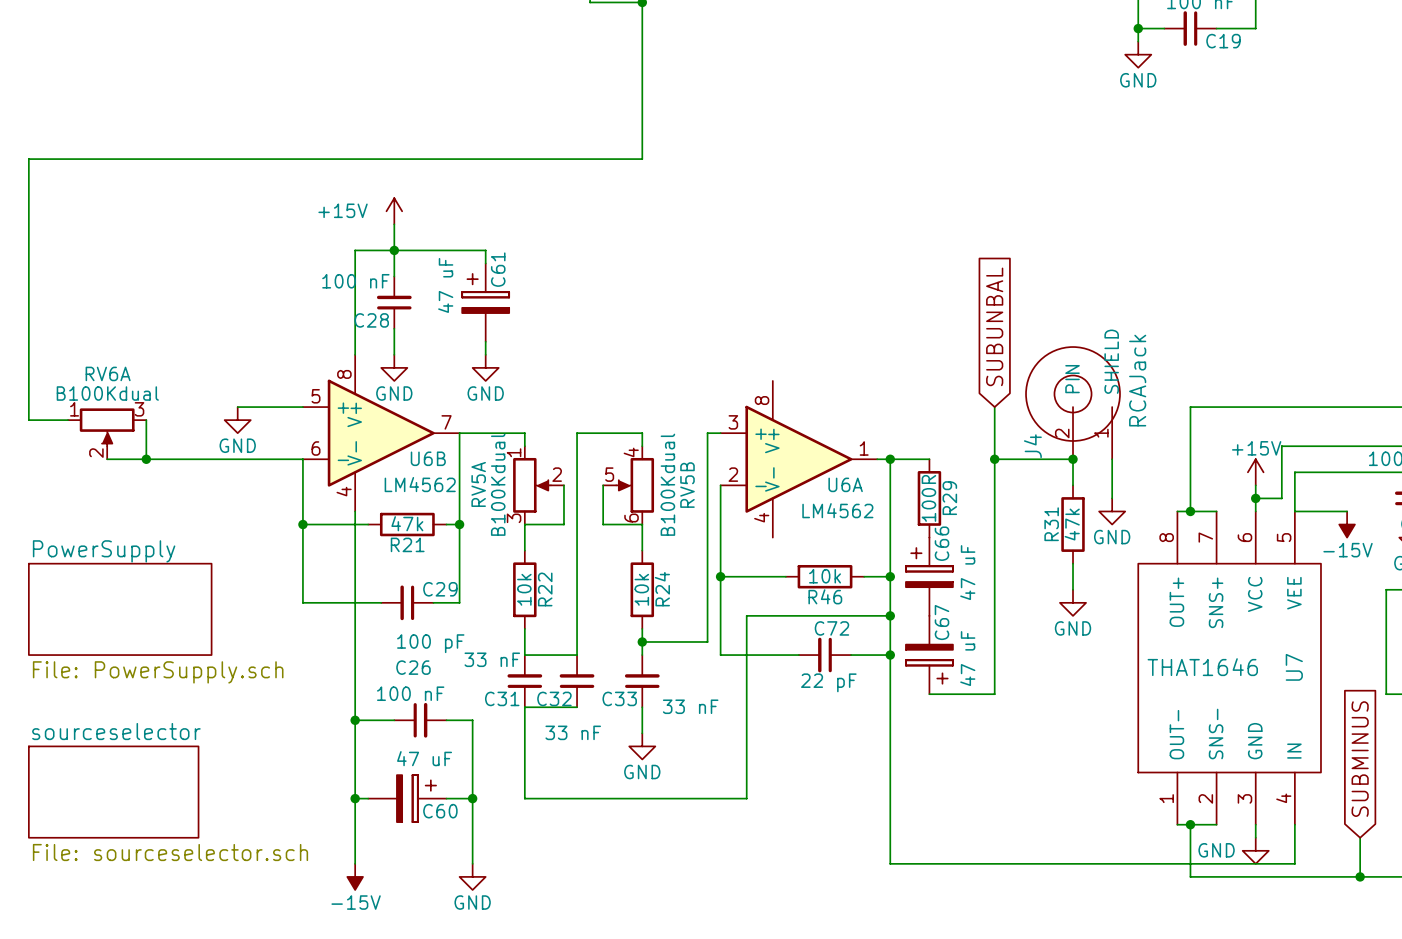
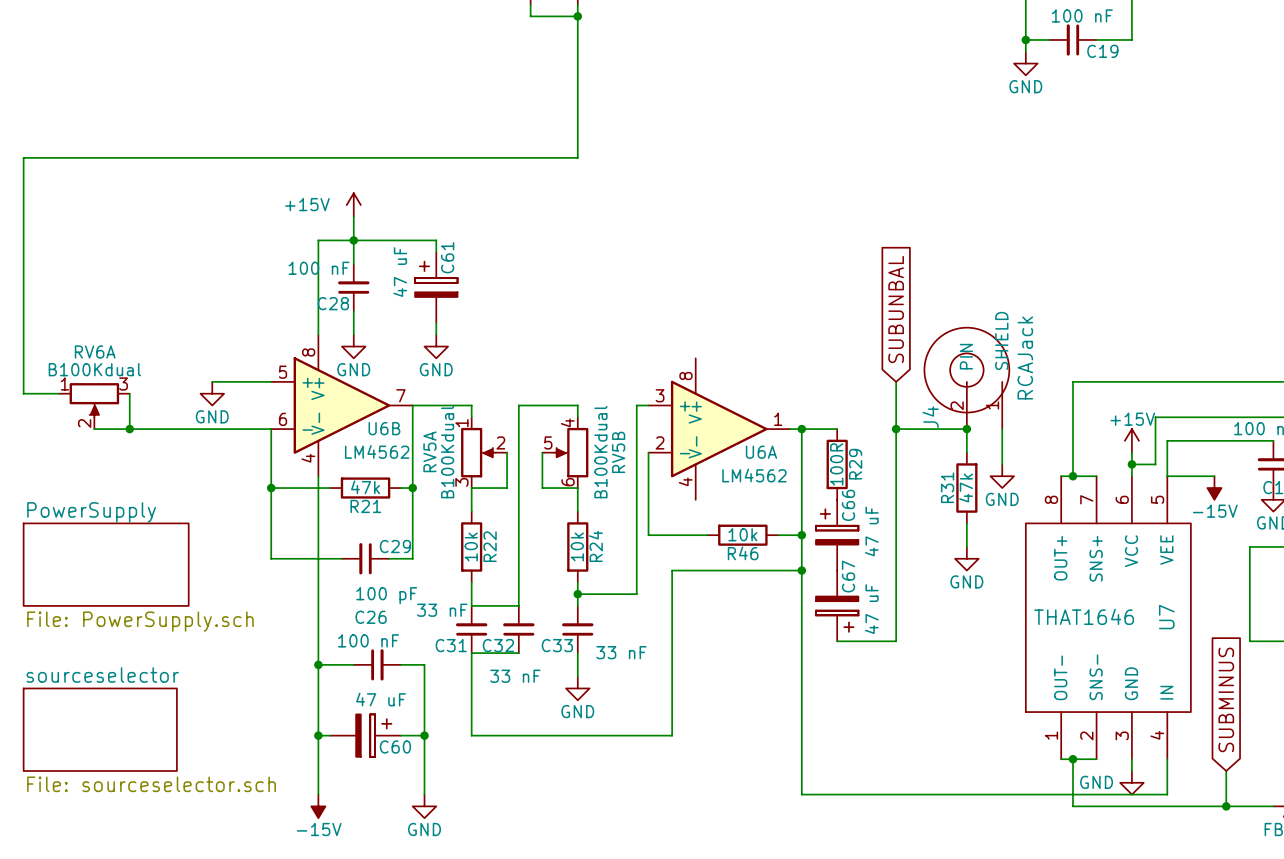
wire: (720, 576) (720, 655) (798, 655) -> none
junction: (720, 576) -> none
C72: 22 pF (825, 655) -> none
wire: (851, 655) (890, 655) -> none
junction: (890, 655) -> none

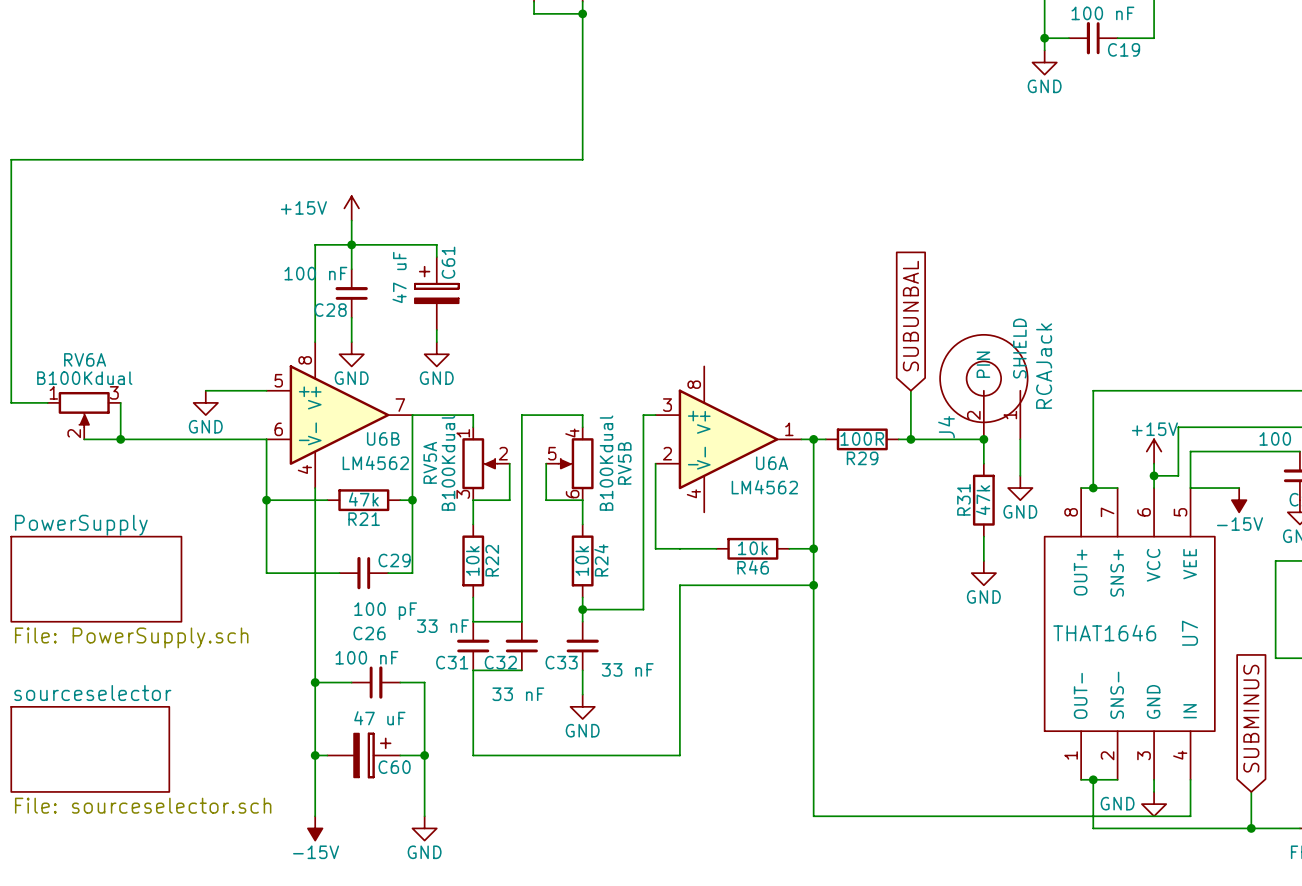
wire: (896, 429) (896, 641) (837, 641) -> (910, 439) (898, 439)
R29 rotation: 0° (837, 464) -> 90° clockwise (862, 439)
C66: 47 uF (837, 535) -> none
C67: 47 uF (837, 605) -> none

